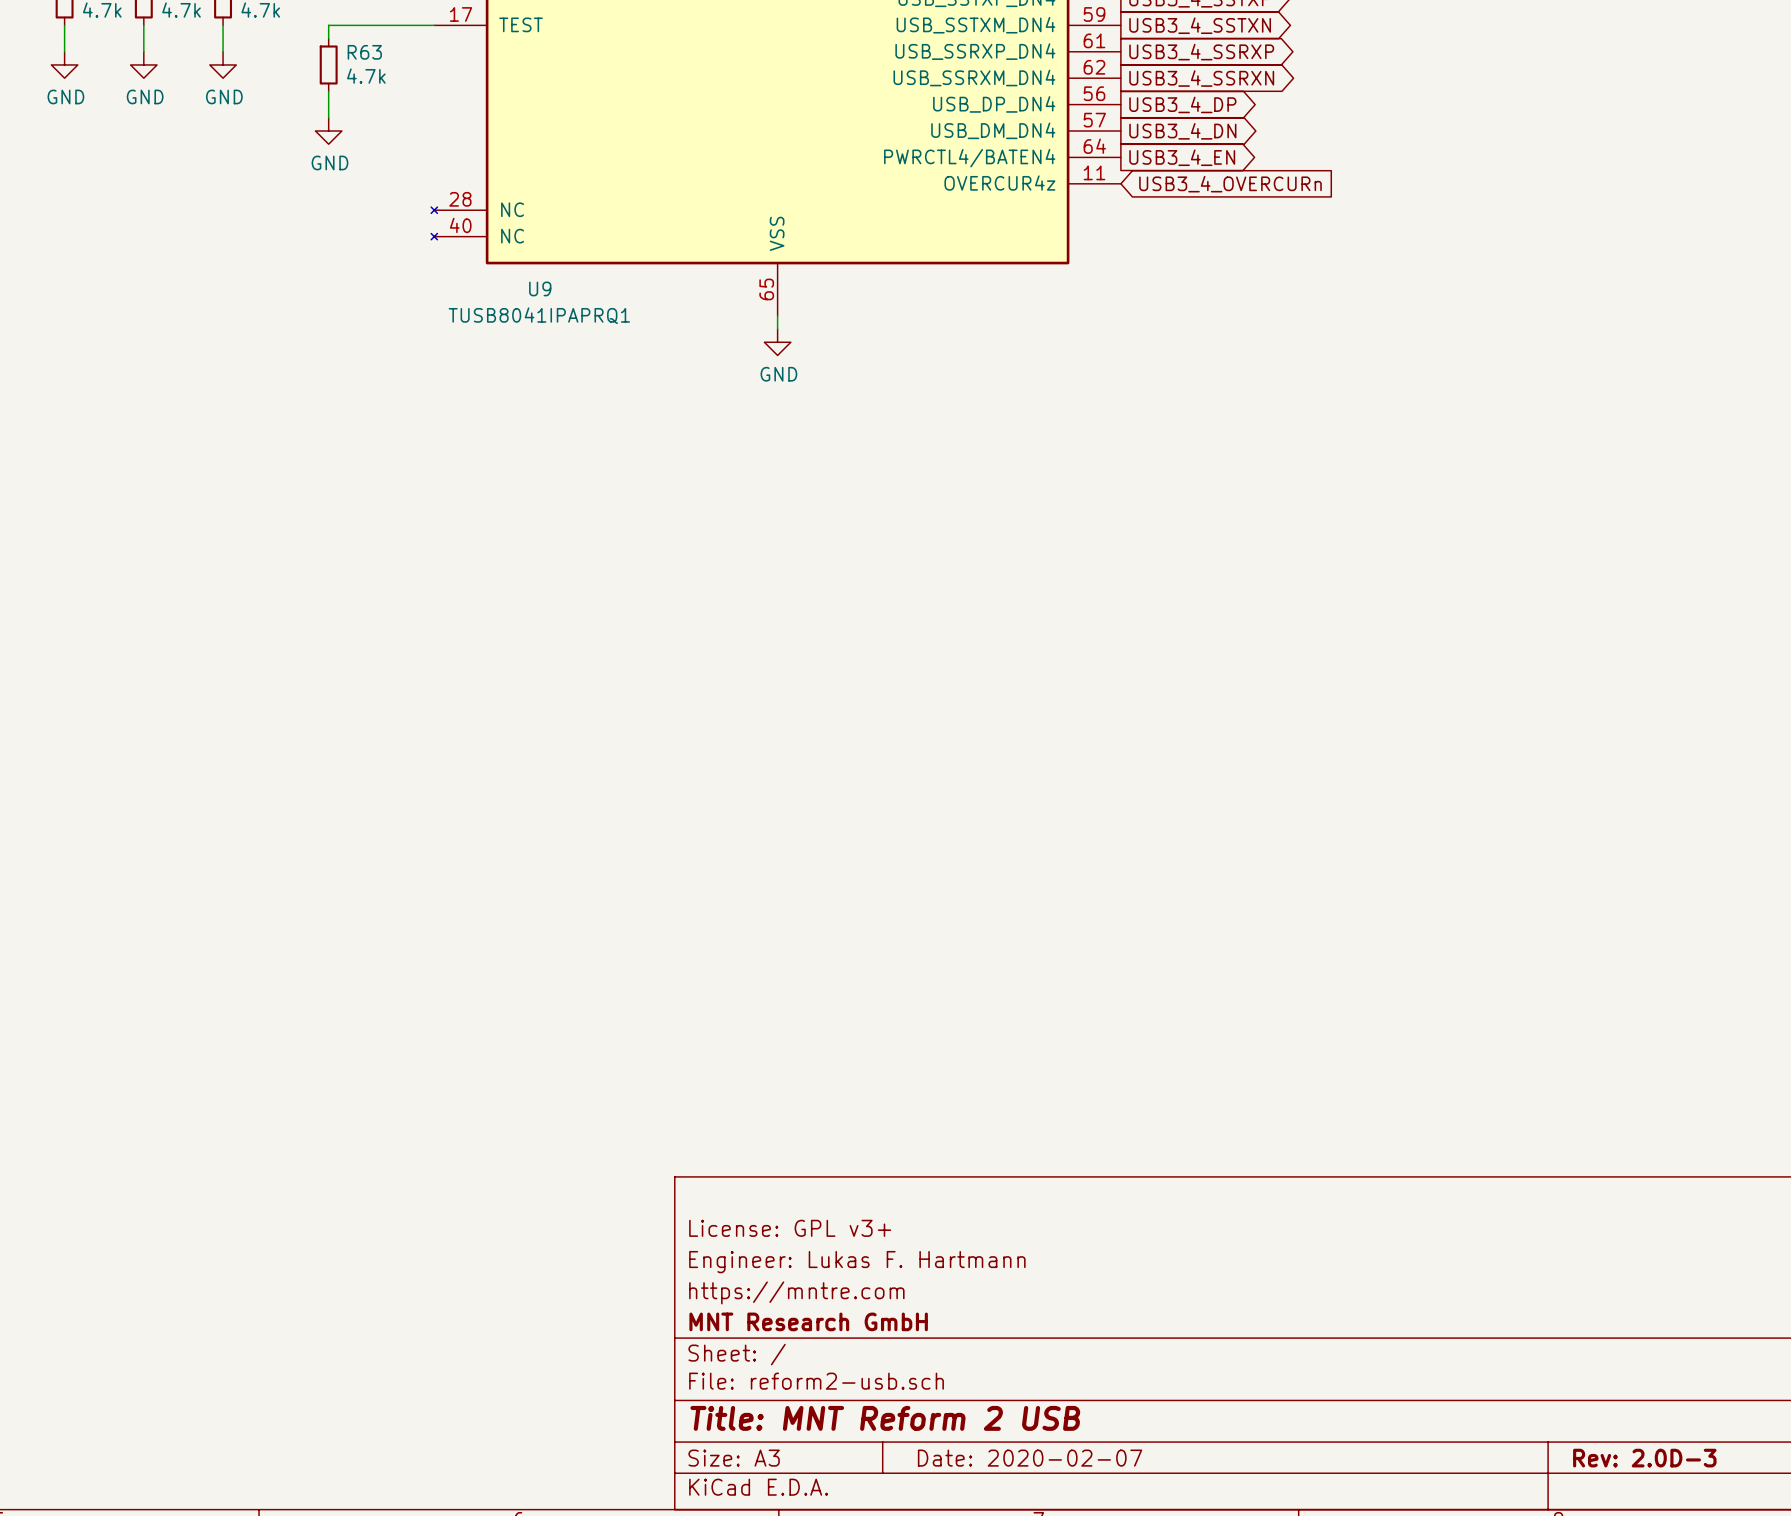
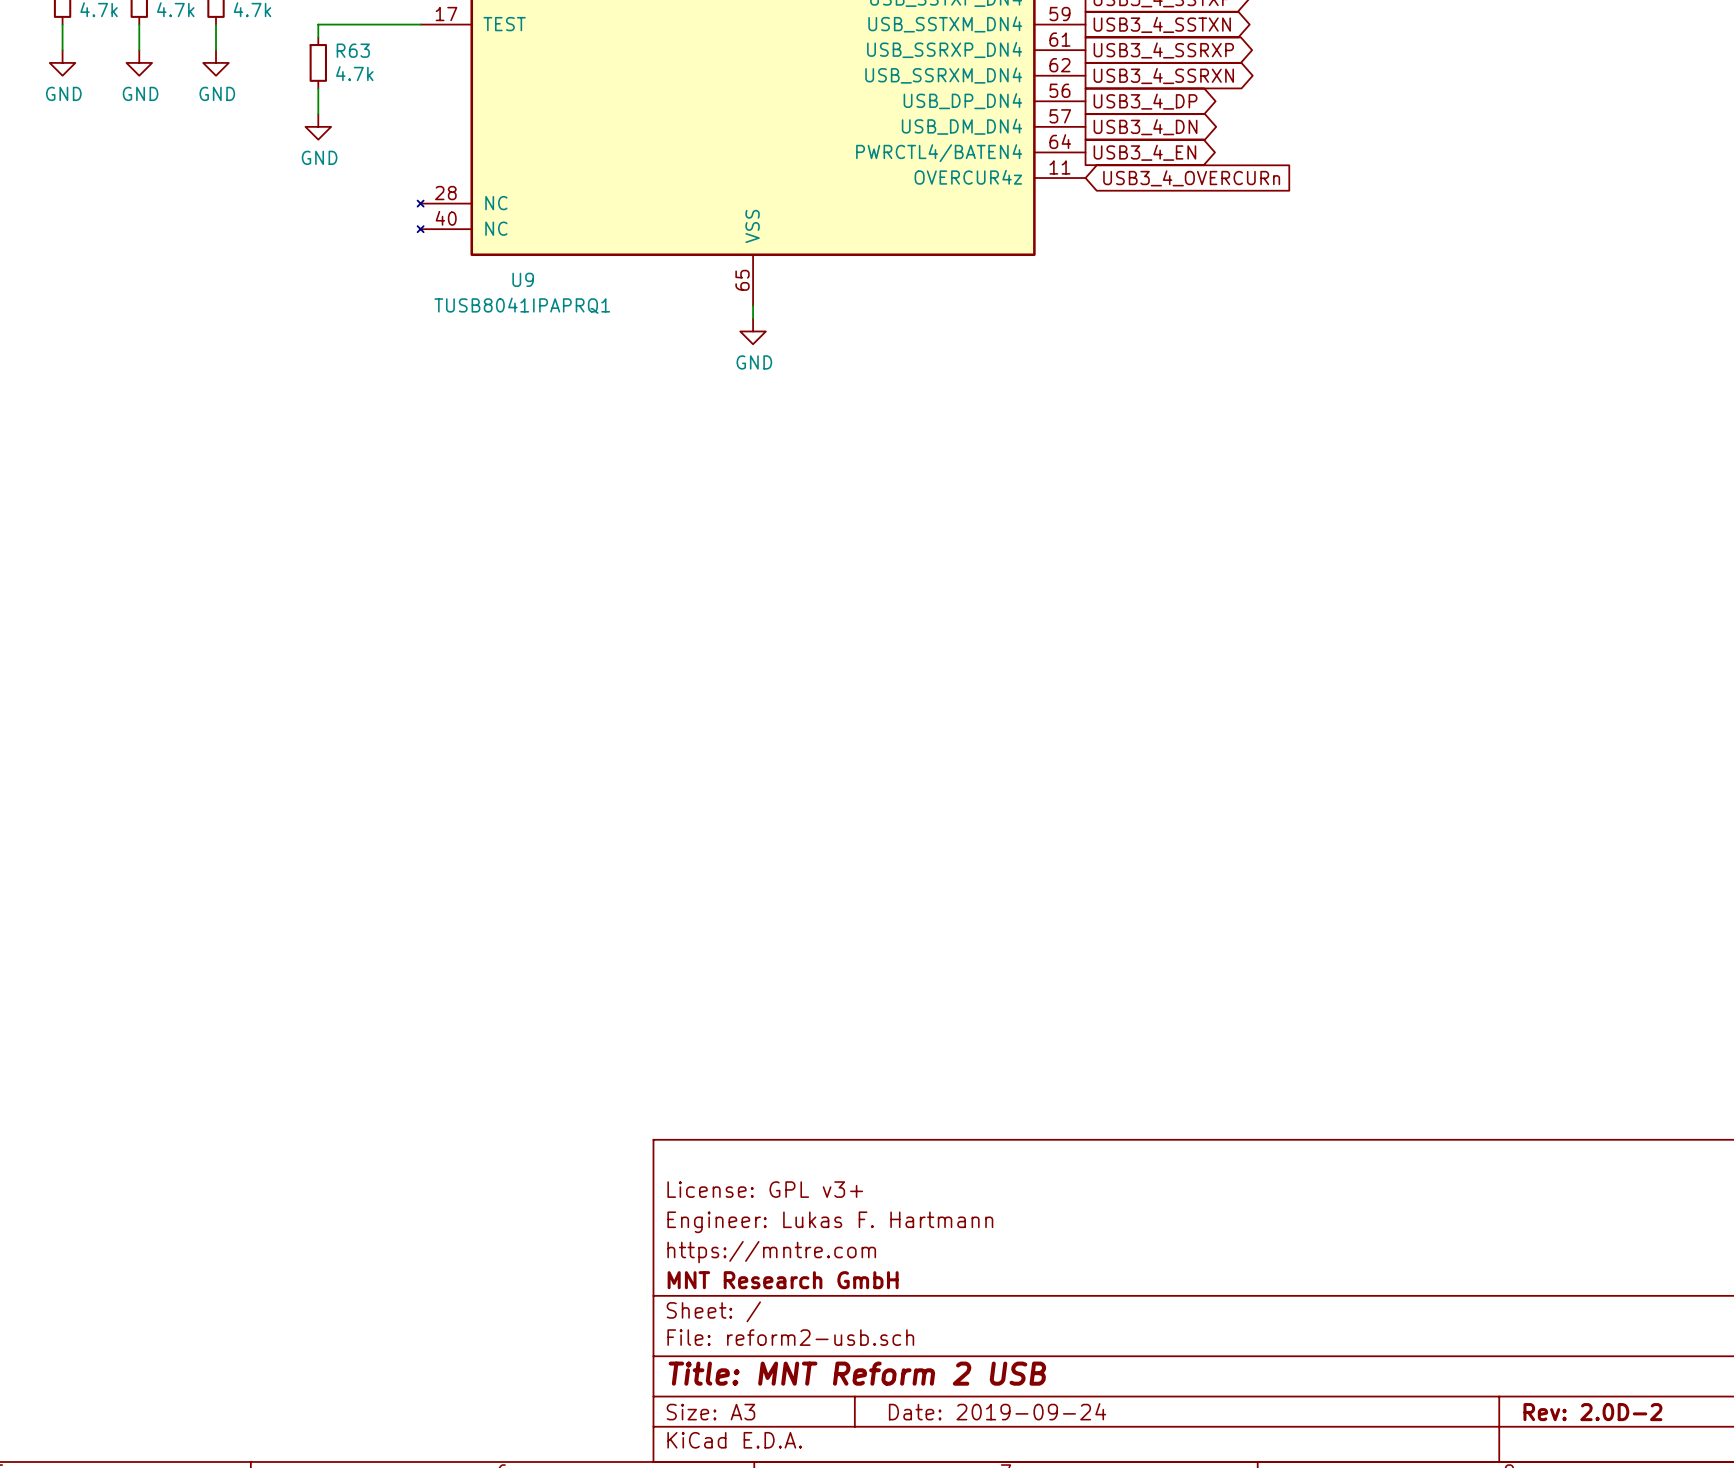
title block: Date: 2020-02-07 (1030, 1458) -> Date: 2019-09-24 (997, 1411)
title block: Rev: 2.0D-3 (1644, 1458) -> Rev: 2.0D-2 (1592, 1412)

